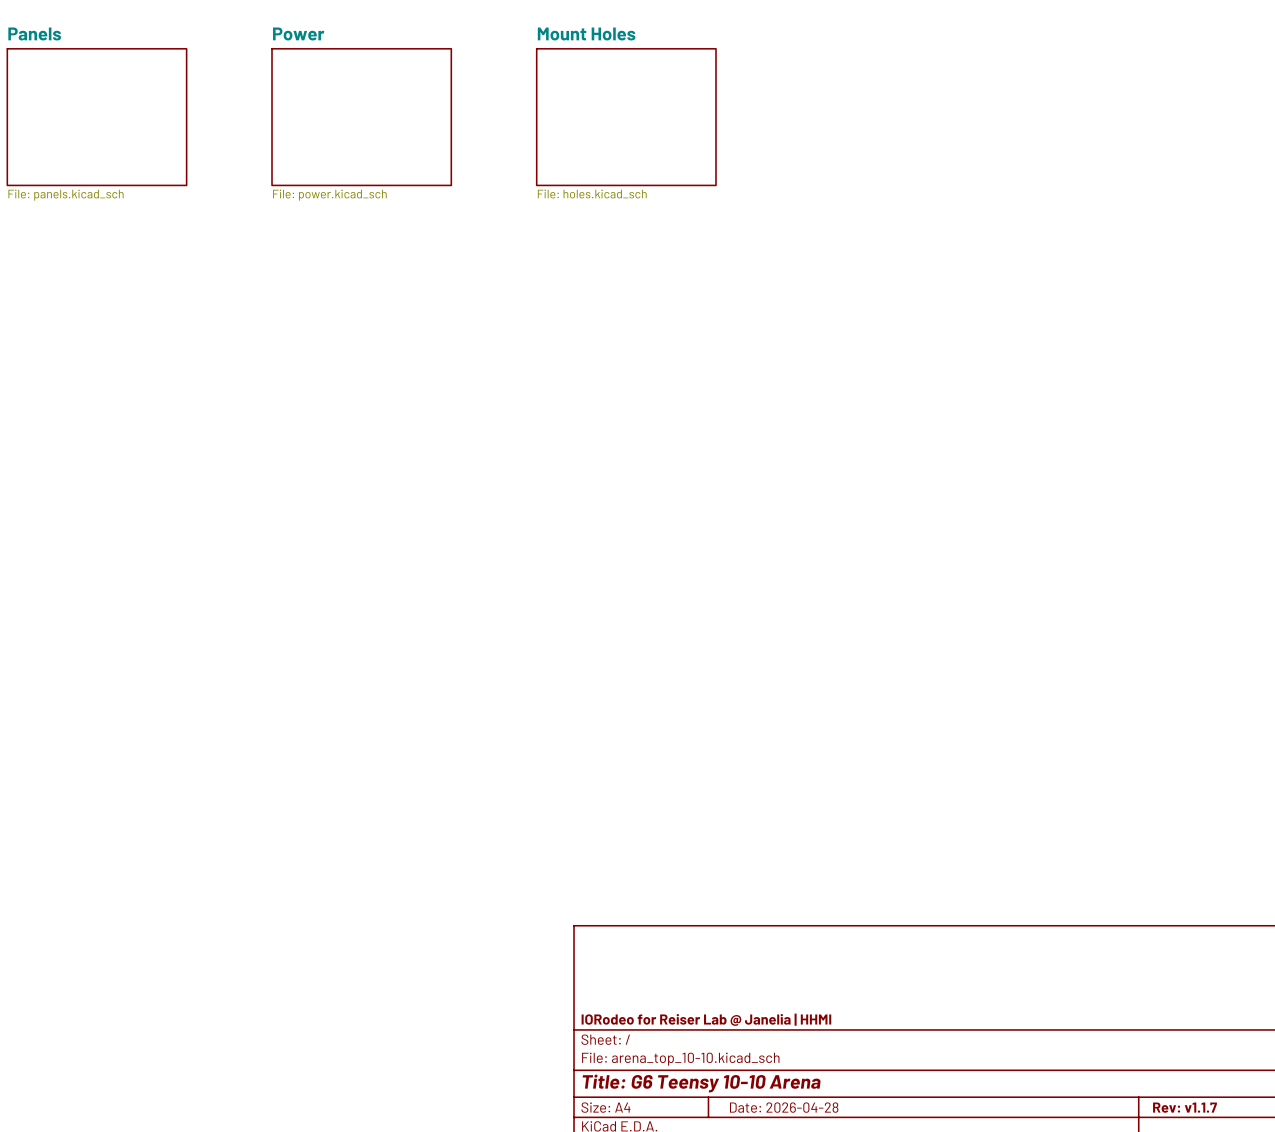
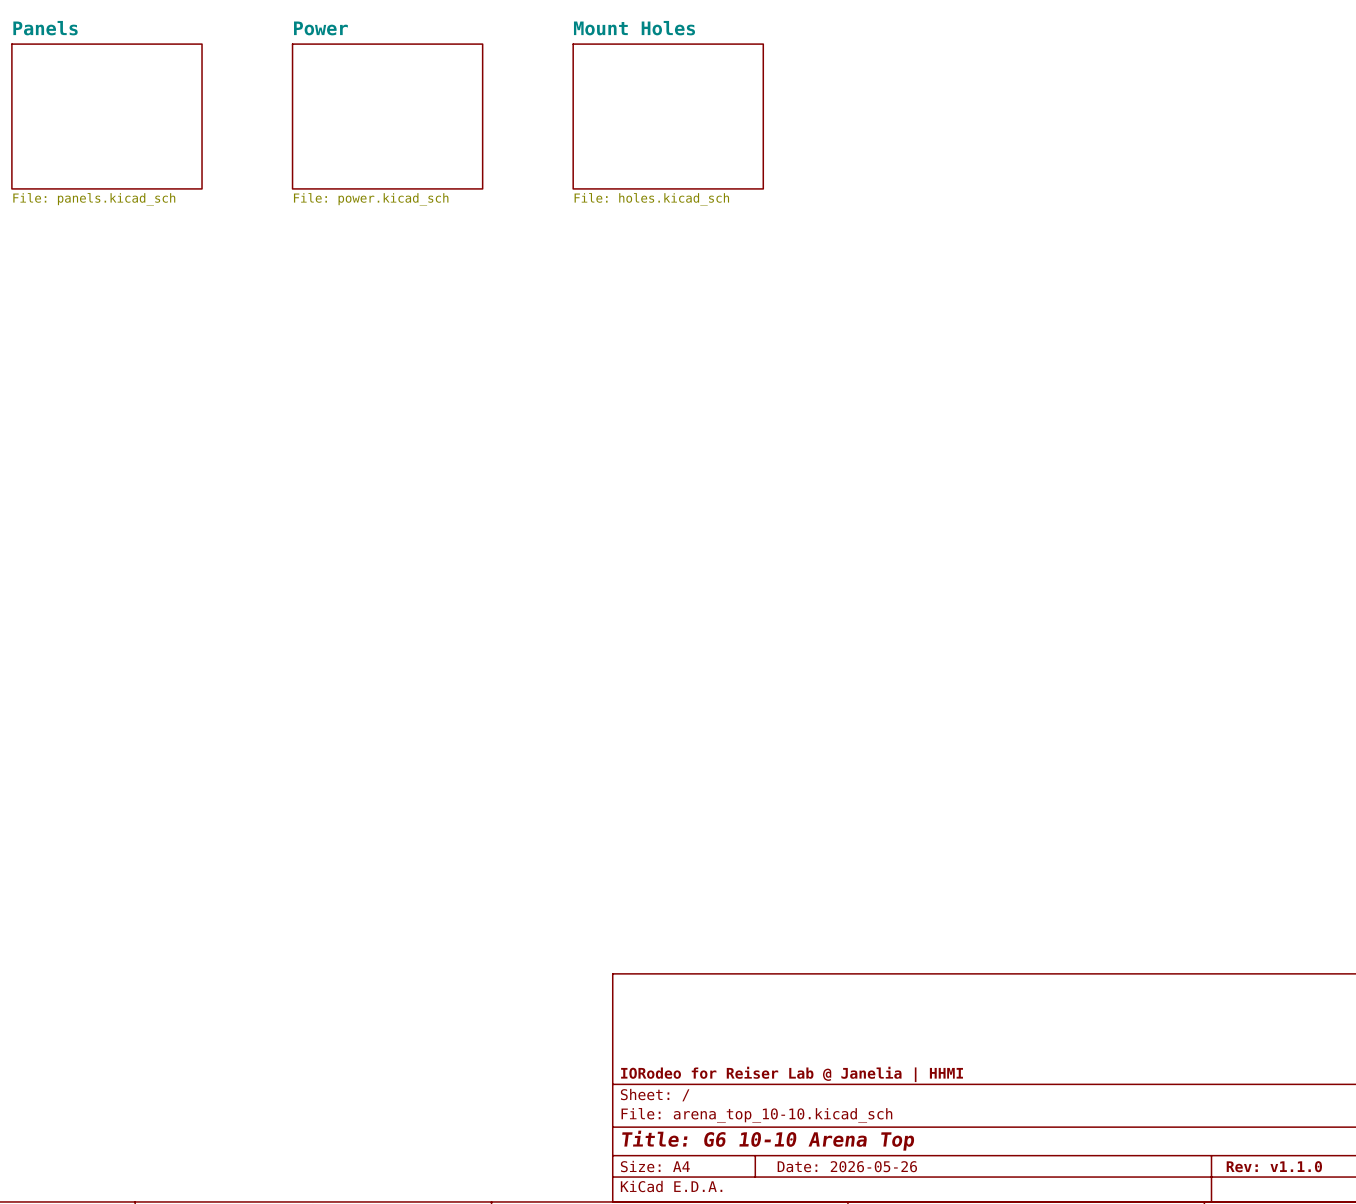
title block: Title: G6 Teensy 10-10 Arena (701, 1083) -> Title: G6 10-10 Arena Top (768, 1140)
title block: Date: 2026-04-28 (784, 1107) -> Date: 2026-05-26 (847, 1166)
title block: Rev: v1.1.7 (1184, 1107) -> Rev: v1.1.0 (1274, 1166)

